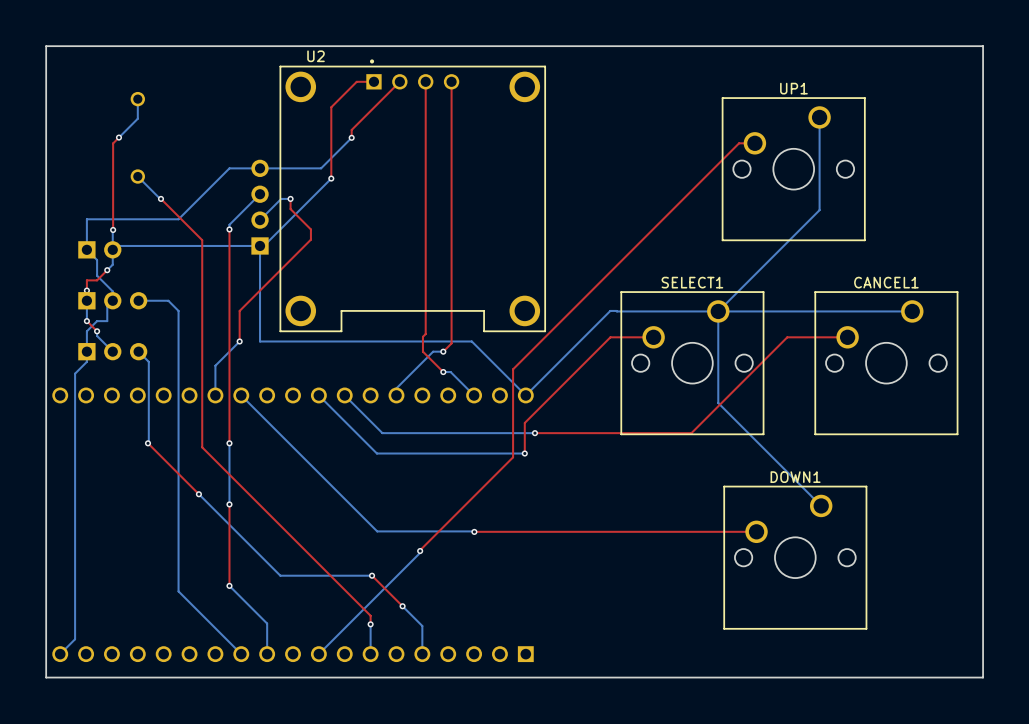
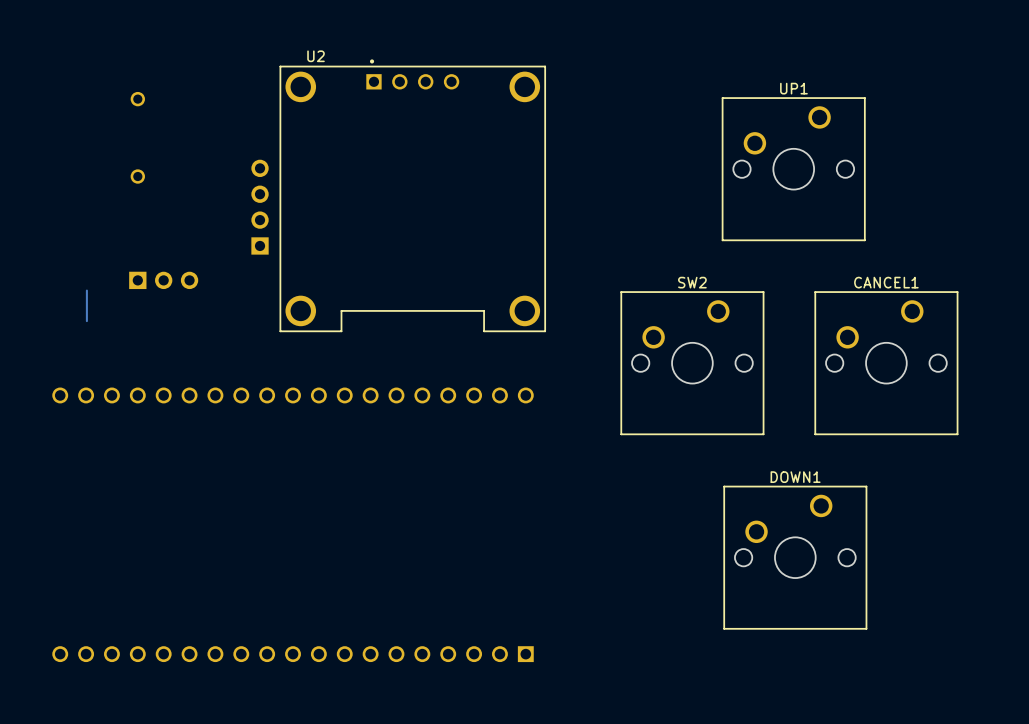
board edge: (46, 46) (983, 46) (983, 677) (46, 677) (46, 46) -> none
top track: (373, 81) (356, 81) (331, 107) (331, 178) -> none
top track: (399, 81) (351, 129) (351, 137) -> none
top track: (425, 81) (425, 334) (422, 336) (422, 351) (443, 372) -> none
top track: (451, 81) (451, 343) (443, 351) -> none
bottom track: (137, 99) (137, 118) (118, 137) -> none
bottom track: (819, 117) (819, 210) (718, 311) (718, 403) (821, 505) -> none
top track: (118, 137) (113, 143) (113, 229) -> none
via: (118, 137) -> none
bottom track: (351, 137) (321, 168) (229, 168) (178, 219) (86, 219) (86, 249) (97, 260) (97, 275) (112, 291) (112, 300) (107, 306) (107, 321) (97, 321) (86, 331) (86, 361) (75, 373) (75, 639) (60, 654) -> none
via: (351, 137) -> none
top track: (754, 143) (739, 143) (513, 369) (513, 457) (420, 551) -> none
bottom track: (137, 176) (160, 198) -> none
bottom track: (331, 178) (263, 245) (116, 245) (112, 249) -> none
via: (331, 178) -> none
bottom track: (260, 194) (229, 224) (229, 229) -> none
top track: (160, 198) (202, 240) (202, 447) (370, 615) (370, 624) -> none
via: (160, 198) -> none
top track: (290, 198) (290, 209) (310, 229) (310, 239) (239, 310) (239, 341) -> none
bottom track: (290, 198) (281, 198) (260, 220) -> none
via: (290, 198) -> none
bottom track: (113, 229) (112, 264) (107, 270) -> none
via: (113, 229) -> none
top track: (229, 229) (229, 443) -> none
via: (229, 229) -> none
bottom track: (260, 245) (260, 341) (471, 341) (525, 395) (610, 310) (912, 311) -> none
part: (99, 249) -> none
top track: (107, 270) (97, 280) (86, 280) (86, 290) -> none
via: (107, 270) -> none
part: none -> (163, 280)
SELECT1 name: SELECT1 (692, 282) -> SW2 (692, 282)
via: (86, 290) -> none
part: (112, 300) -> none
bottom track: (138, 300) (168, 300) (178, 310) (178, 591) (241, 654) -> none
top track: (86, 321) (97, 331) -> none
via: (86, 321) -> none
bottom track: (97, 331) (97, 335) (112, 351) -> none
via: (97, 331) -> none
top track: (653, 337) (610, 337) (524, 422) (524, 453) -> none
top track: (847, 337) (787, 337) (691, 433) (534, 433) -> none
bottom track: (239, 341) (215, 365) (215, 395) -> none
via: (239, 341) -> none
part: (112, 351) -> none
bottom track: (138, 351) (148, 361) (148, 443) -> none
bottom track: (443, 351) (433, 351) (396, 388) (396, 395) -> none
via: (443, 351) -> none
bottom track: (443, 372) (450, 372) (474, 395) -> none
via: (443, 372) -> none
bottom track: (241, 395) (377, 531) (474, 531) -> none
bottom track: (318, 395) (376, 453) (524, 453) -> none
bottom track: (344, 395) (382, 433) (534, 433) -> none
via: (534, 433) -> none
top track: (148, 443) (198, 494) -> none
via: (148, 443) -> none
bottom track: (229, 443) (229, 504) -> none
via: (229, 443) -> none
via: (524, 453) -> none
bottom track: (198, 494) (280, 575) (372, 575) -> none
via: (198, 494) -> none
top track: (229, 504) (229, 585) -> none
via: (229, 504) -> none
top track: (474, 531) (756, 531) -> none
via: (474, 531) -> none
bottom track: (420, 551) (318, 654) -> none
via: (420, 551) -> none
top track: (372, 575) (402, 606) -> none
via: (372, 575) -> none
bottom track: (229, 585) (267, 623) (267, 654) -> none
via: (229, 585) -> none
bottom track: (402, 606) (422, 626) (422, 654) -> none
via: (402, 606) -> none
bottom track: (370, 624) (370, 654) -> none
via: (370, 624) -> none

